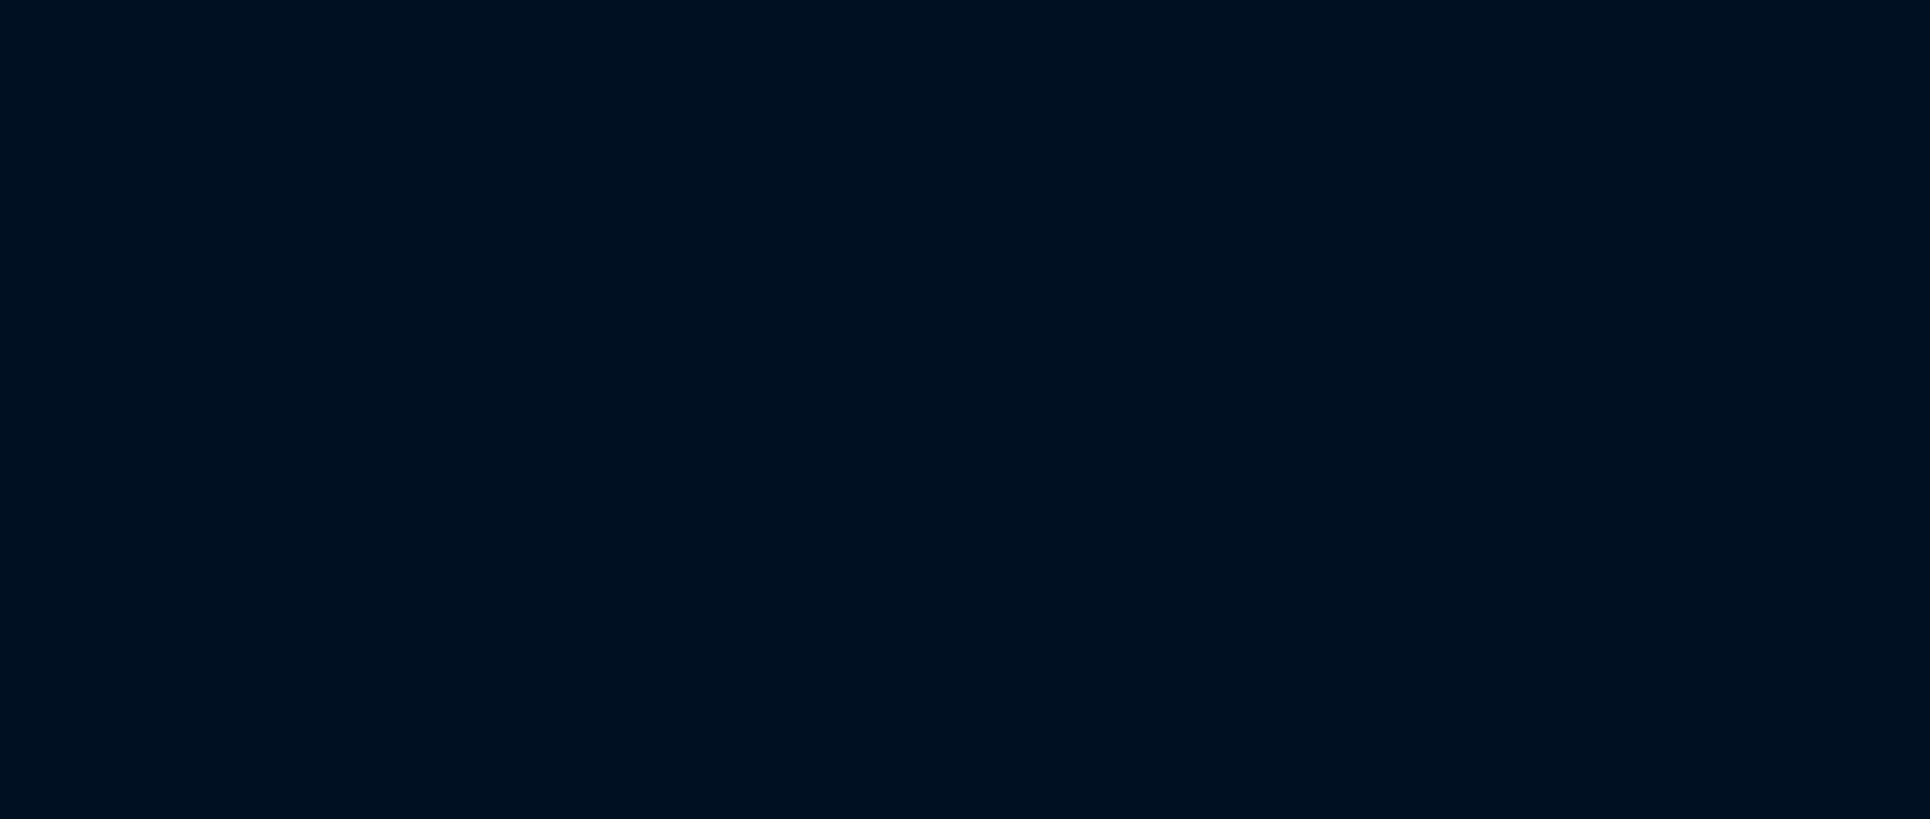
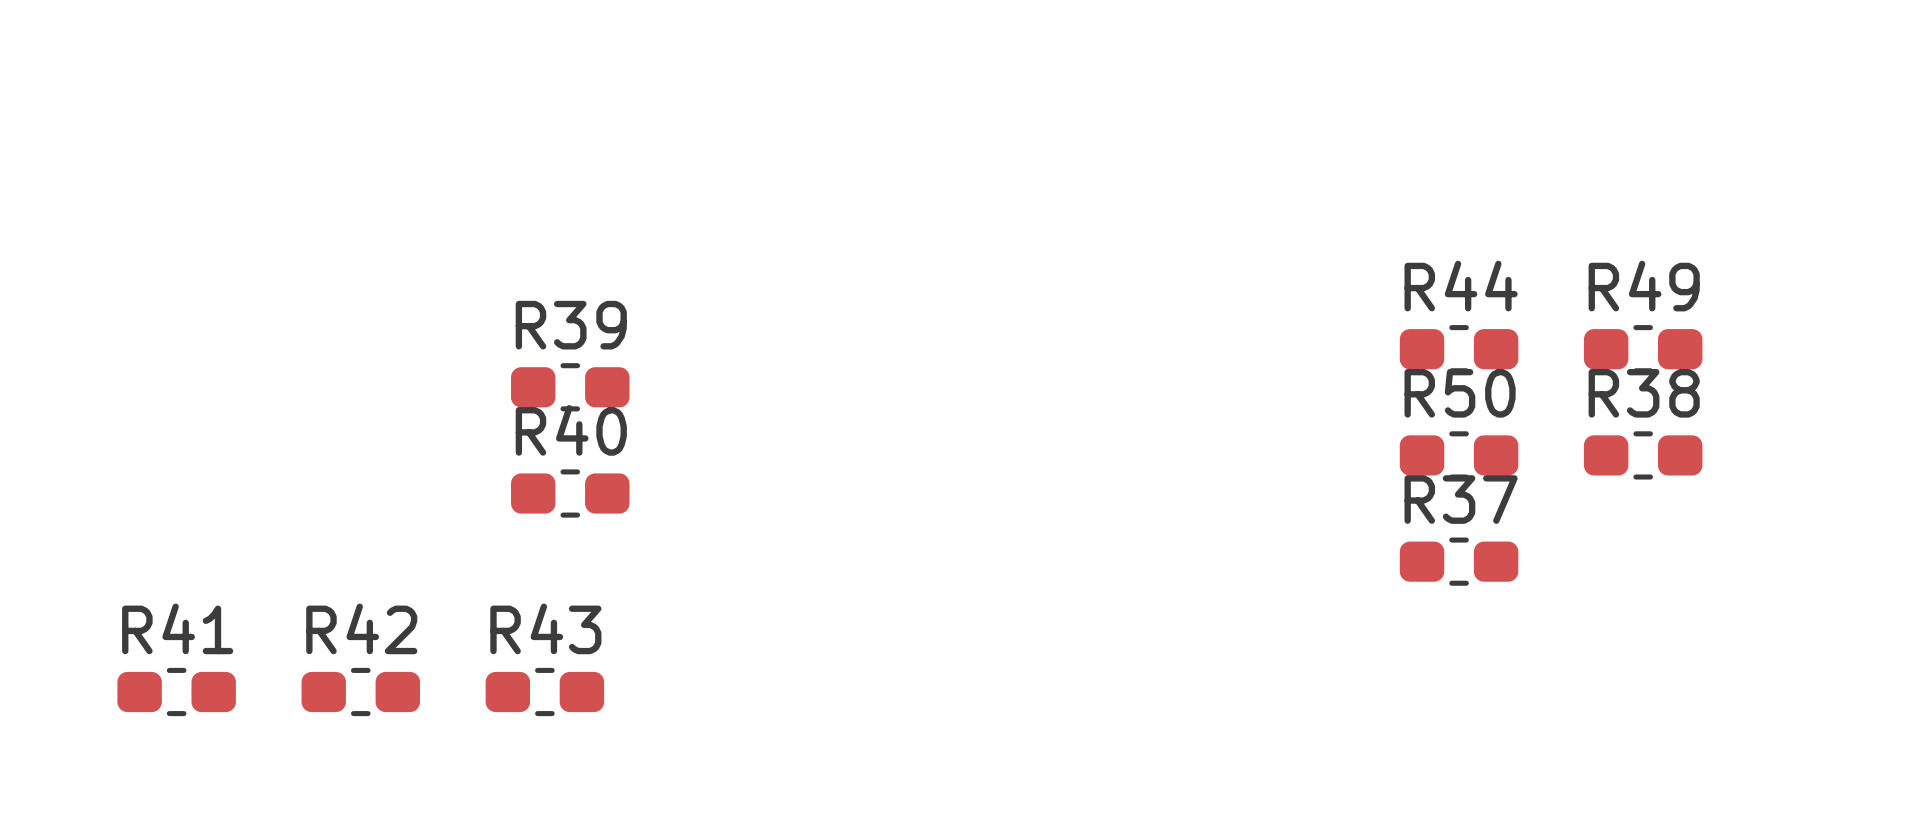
R44: none -> (1459, 349)
R49: none -> (1643, 349)
R39: none -> (570, 387)
R50: none -> (1459, 455)
R38: none -> (1643, 455)
R40: none -> (570, 493)
R37: none -> (1459, 561)
R41: none -> (176, 692)
R42: none -> (360, 692)
R43: none -> (544, 692)

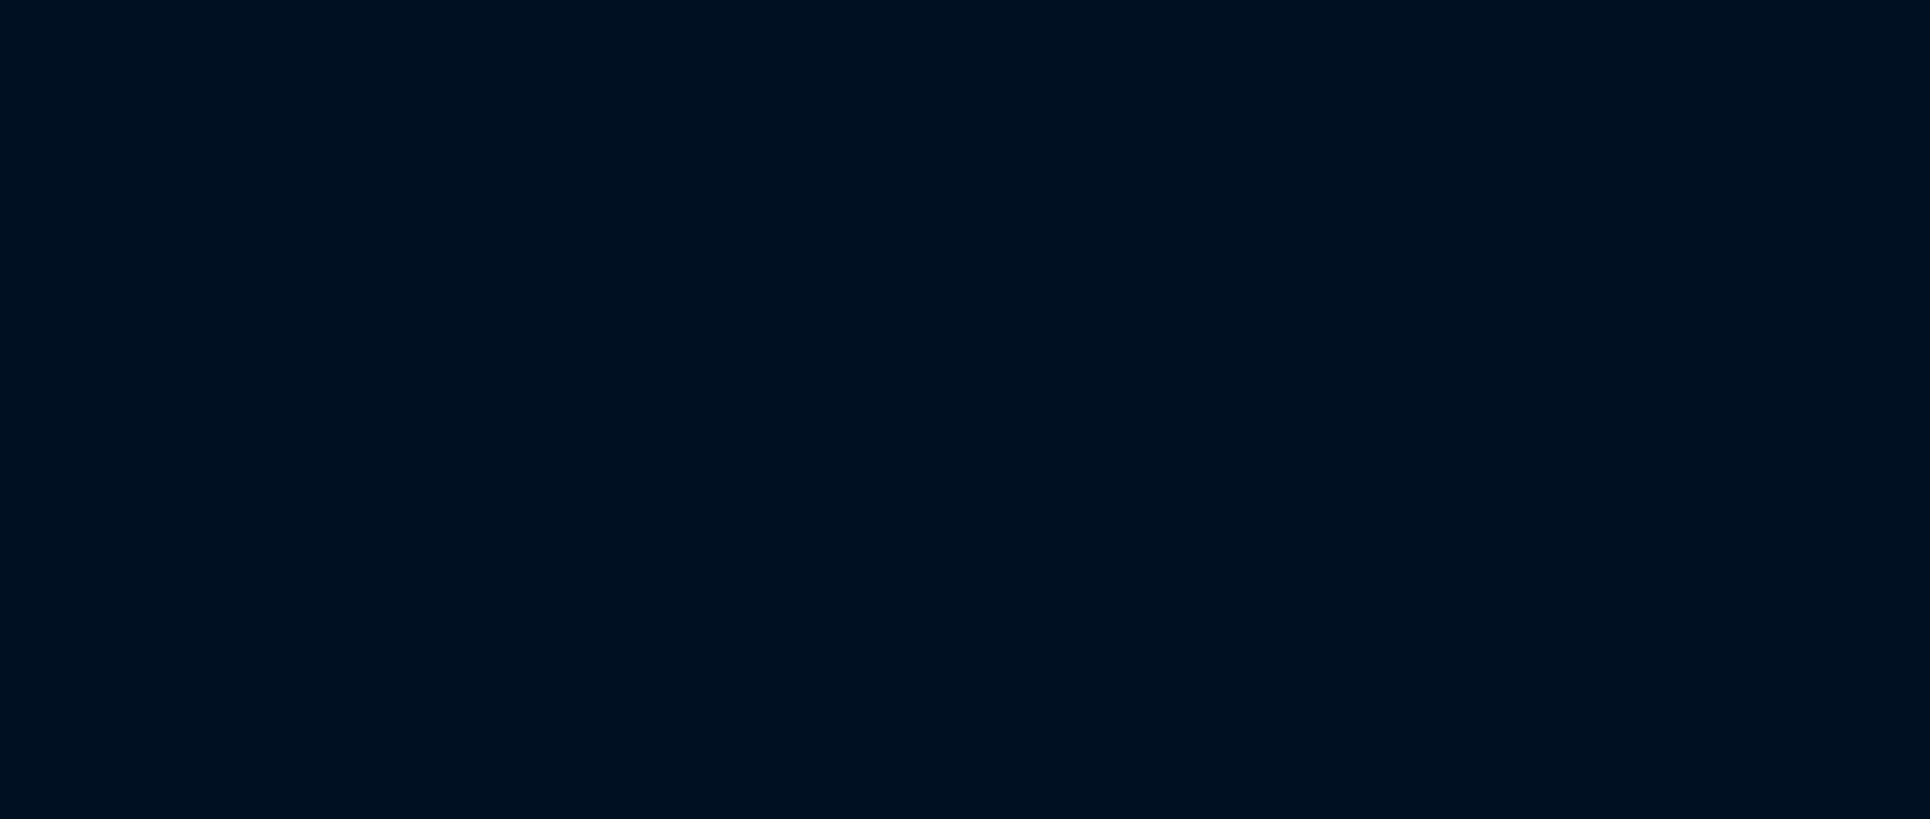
R44: (1459, 349) -> none
R49: (1643, 349) -> none
R39: (570, 387) -> none
R50: (1459, 455) -> none
R38: (1643, 455) -> none
R40: (570, 493) -> none
R37: (1459, 561) -> none
R41: (176, 692) -> none
R42: (360, 692) -> none
R43: (544, 692) -> none

